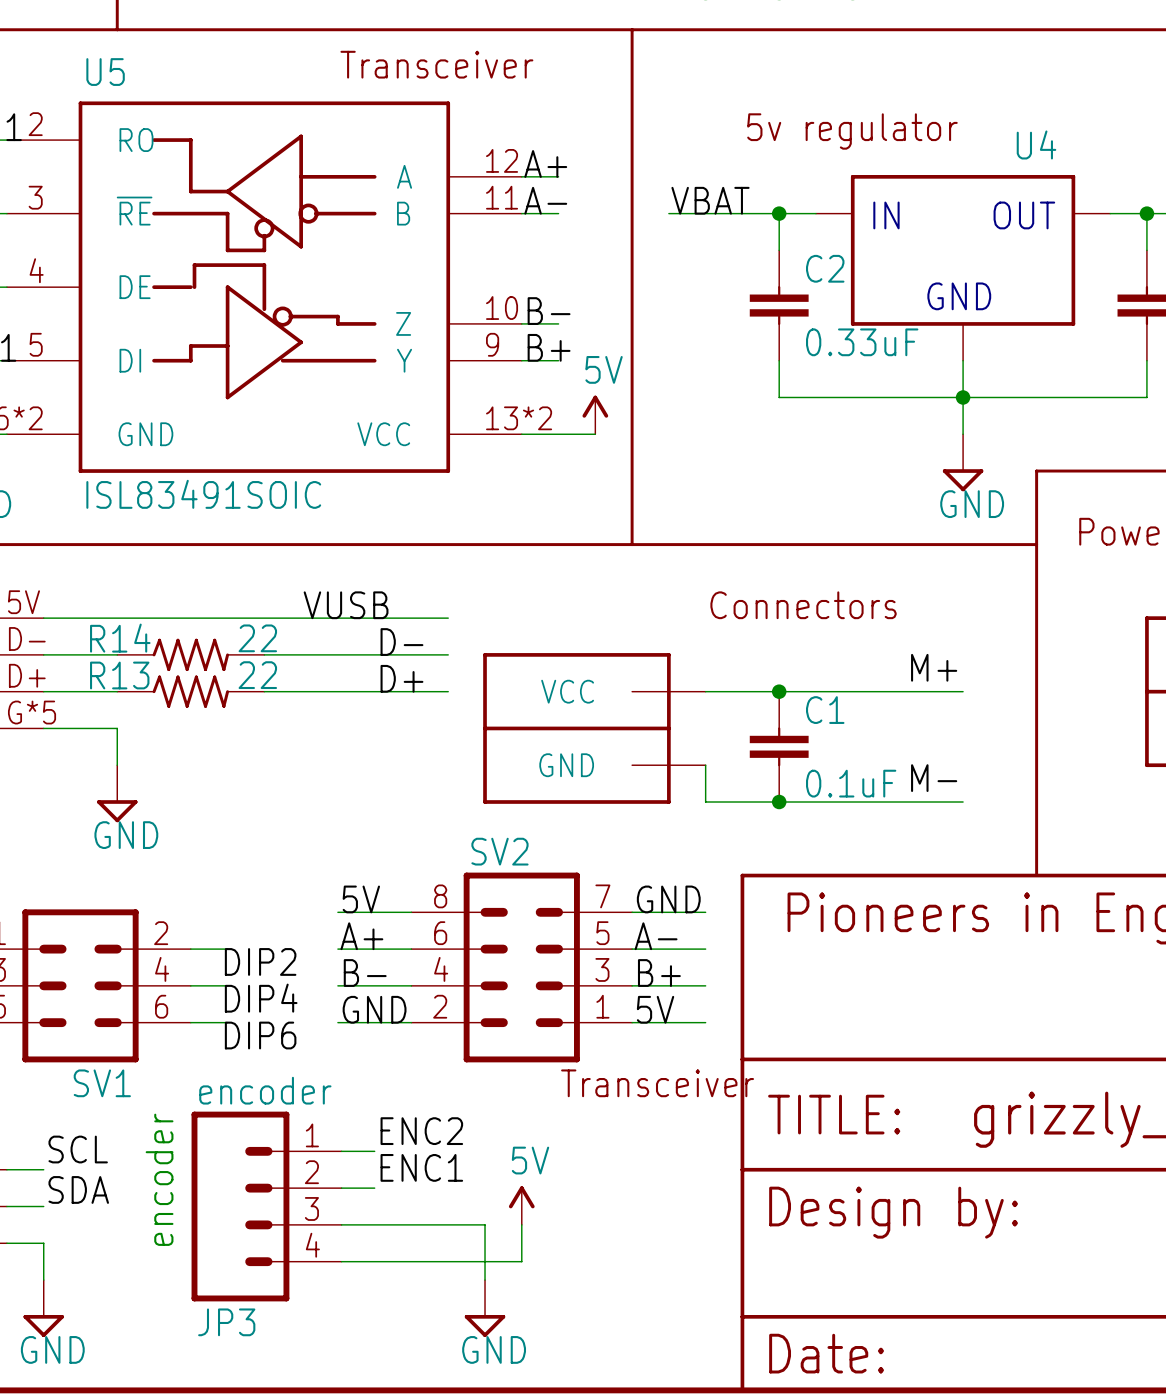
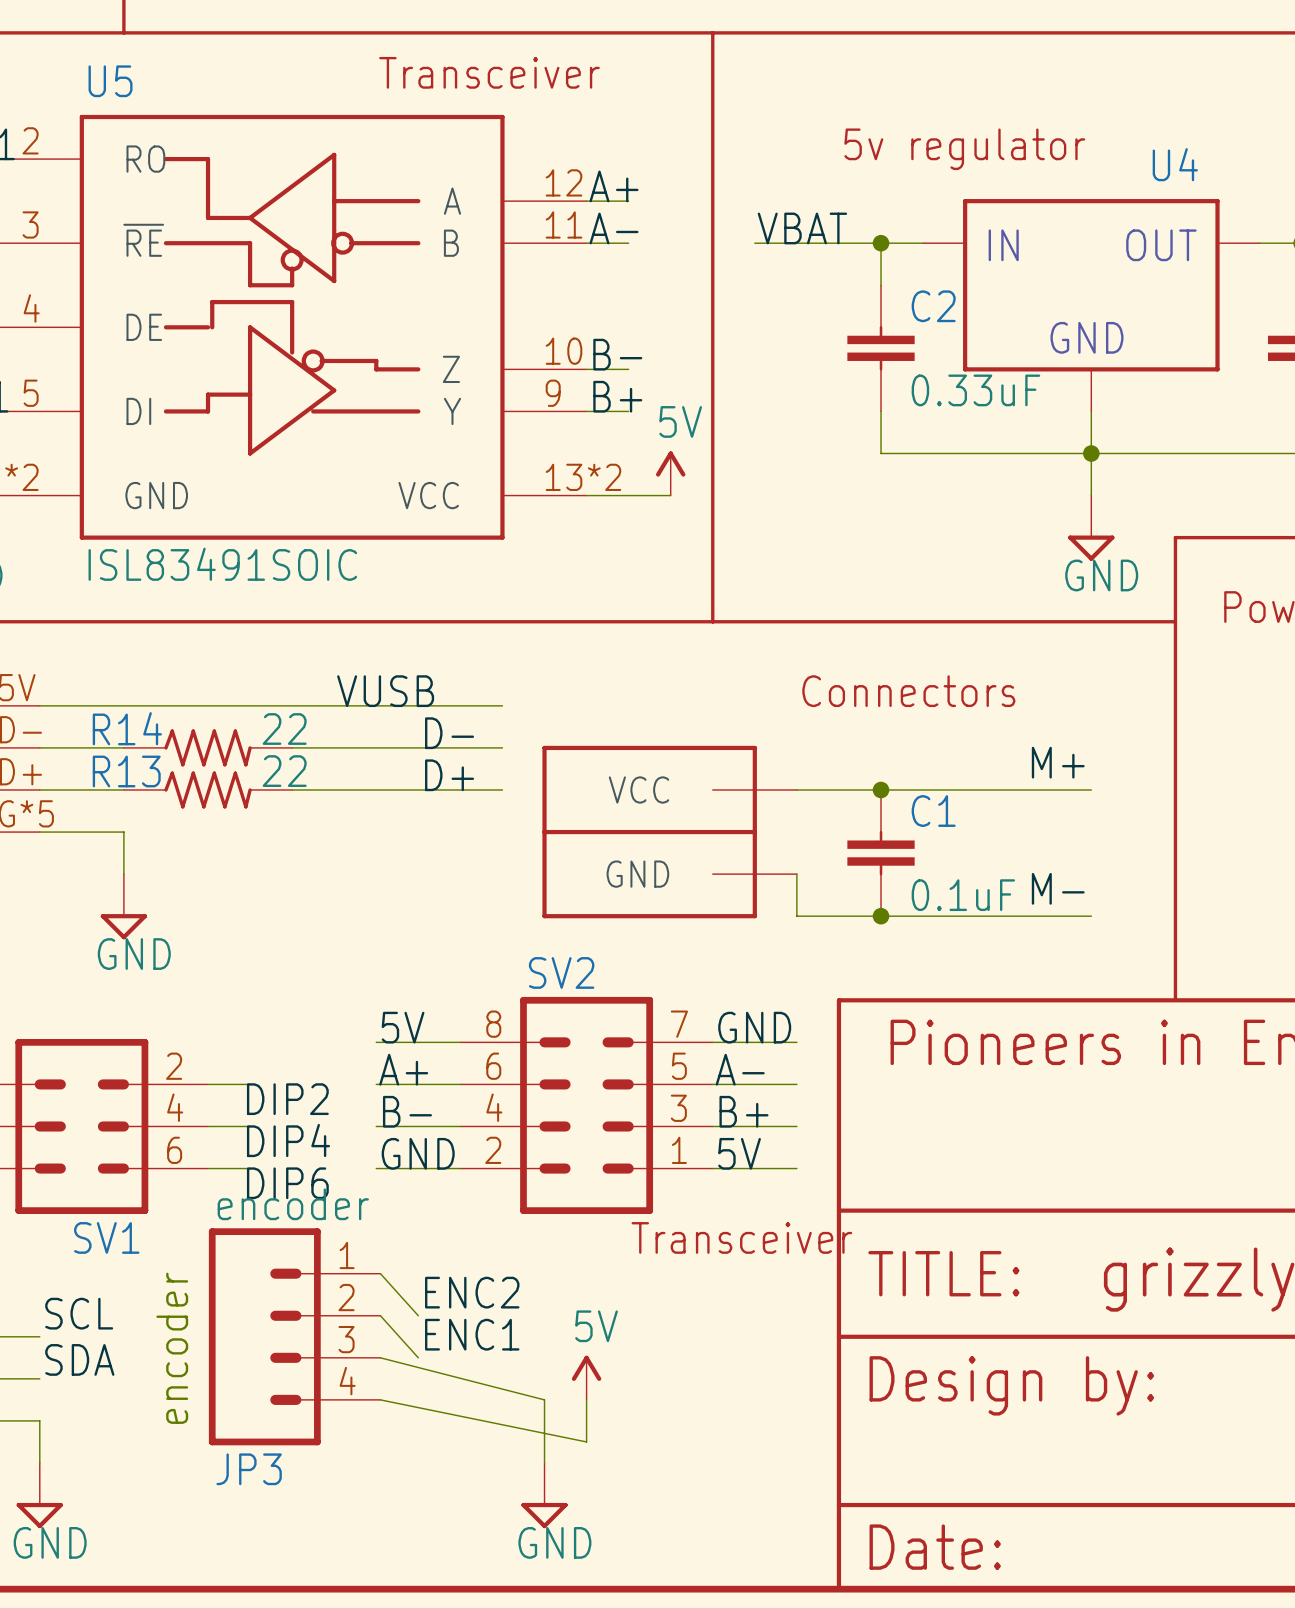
wire: (341, 1151) (374, 1151) -> (380, 1273) (418, 1315)
wire: (341, 1188) (374, 1188) -> (380, 1315) (418, 1357)
JP3 position: (266, 1206) -> (294, 1336)
wire: (341, 1224) (485, 1224) -> (380, 1357) (544, 1399)
wire: (341, 1261) (521, 1261) -> (380, 1399) (586, 1441)

